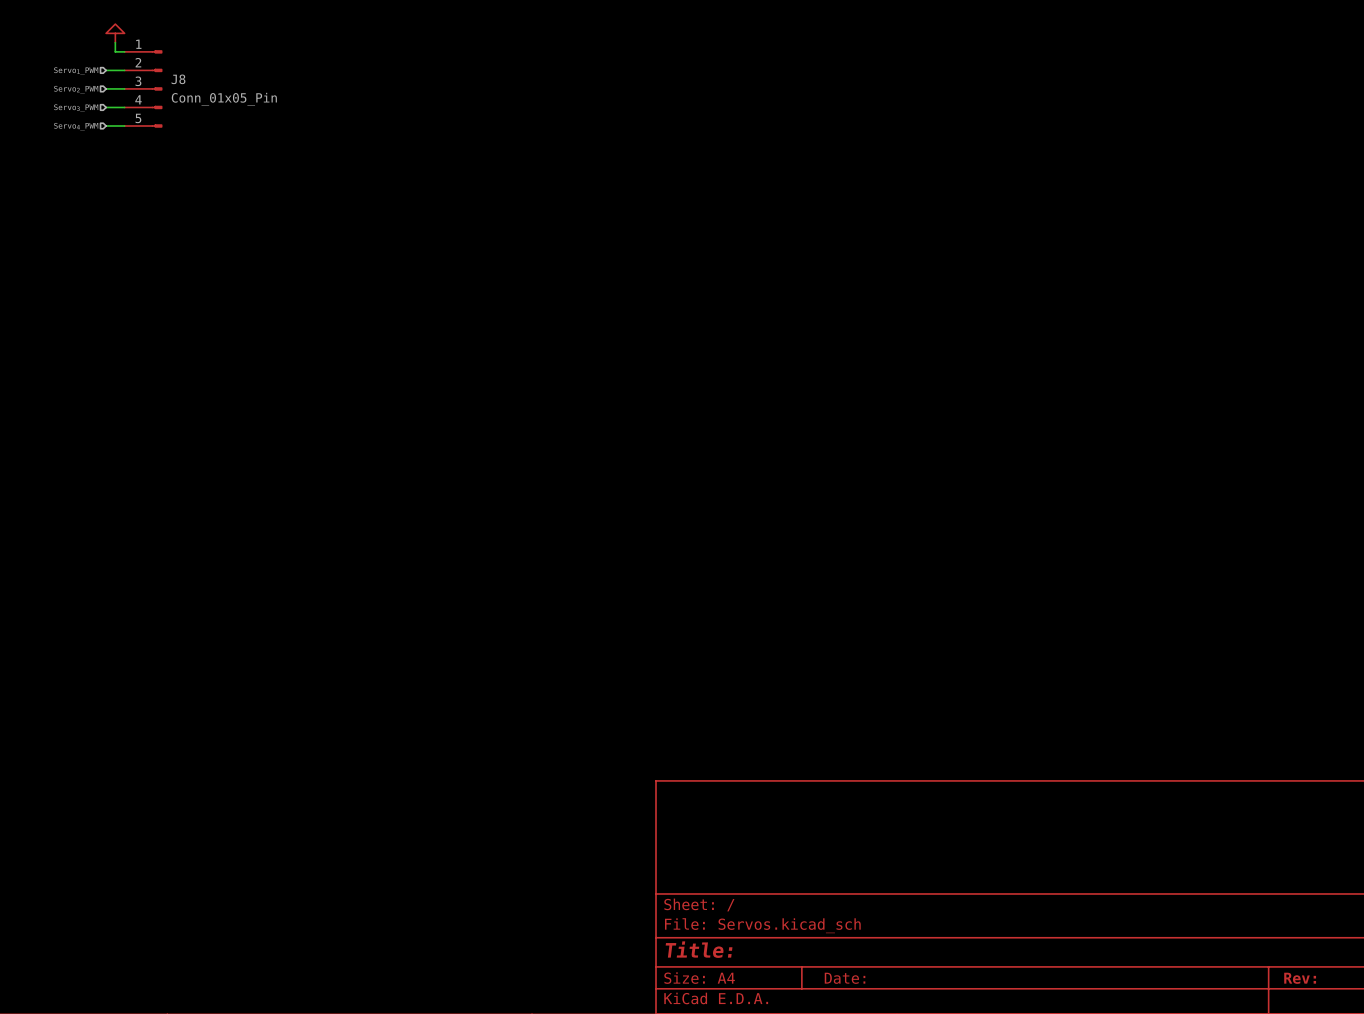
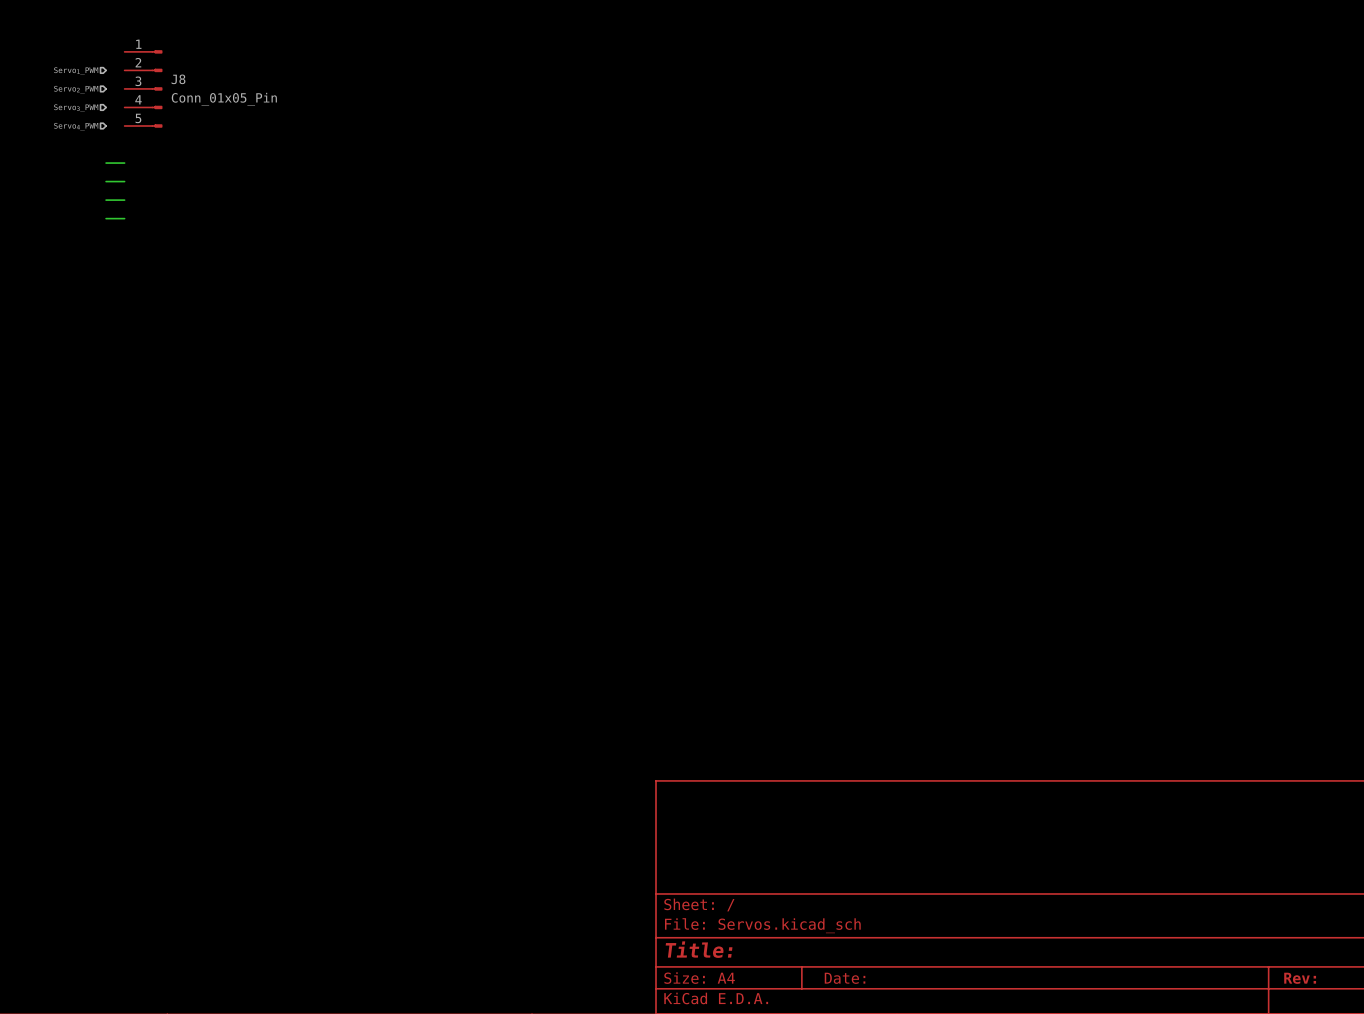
power symbol: (115, 33) -> none
wire: (115, 42) (115, 51) (124, 51) -> none
wire: (106, 70) (124, 70) -> (106, 163) (124, 163)
wire: (106, 88) (124, 88) -> (106, 181) (124, 181)
wire: (106, 107) (124, 107) -> (106, 200) (124, 200)
wire: (106, 125) (124, 125) -> (106, 218) (124, 218)

